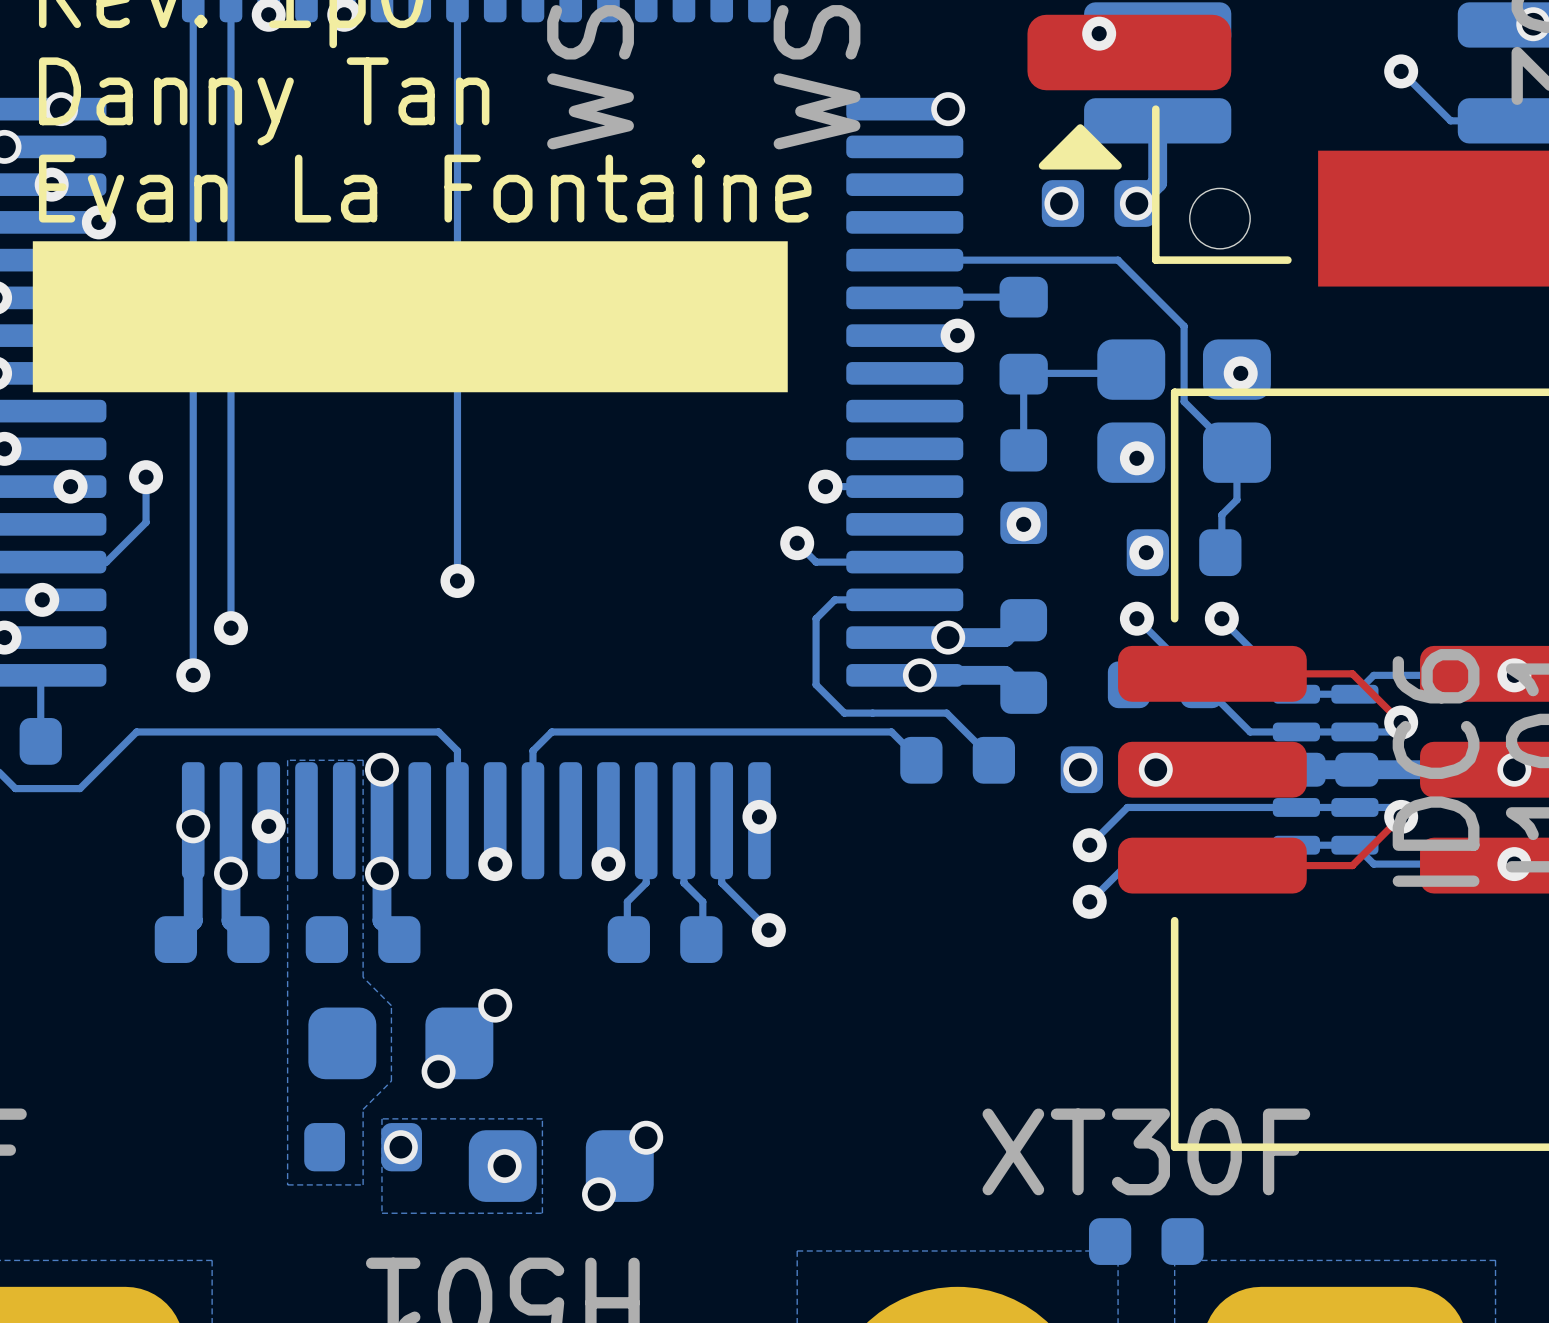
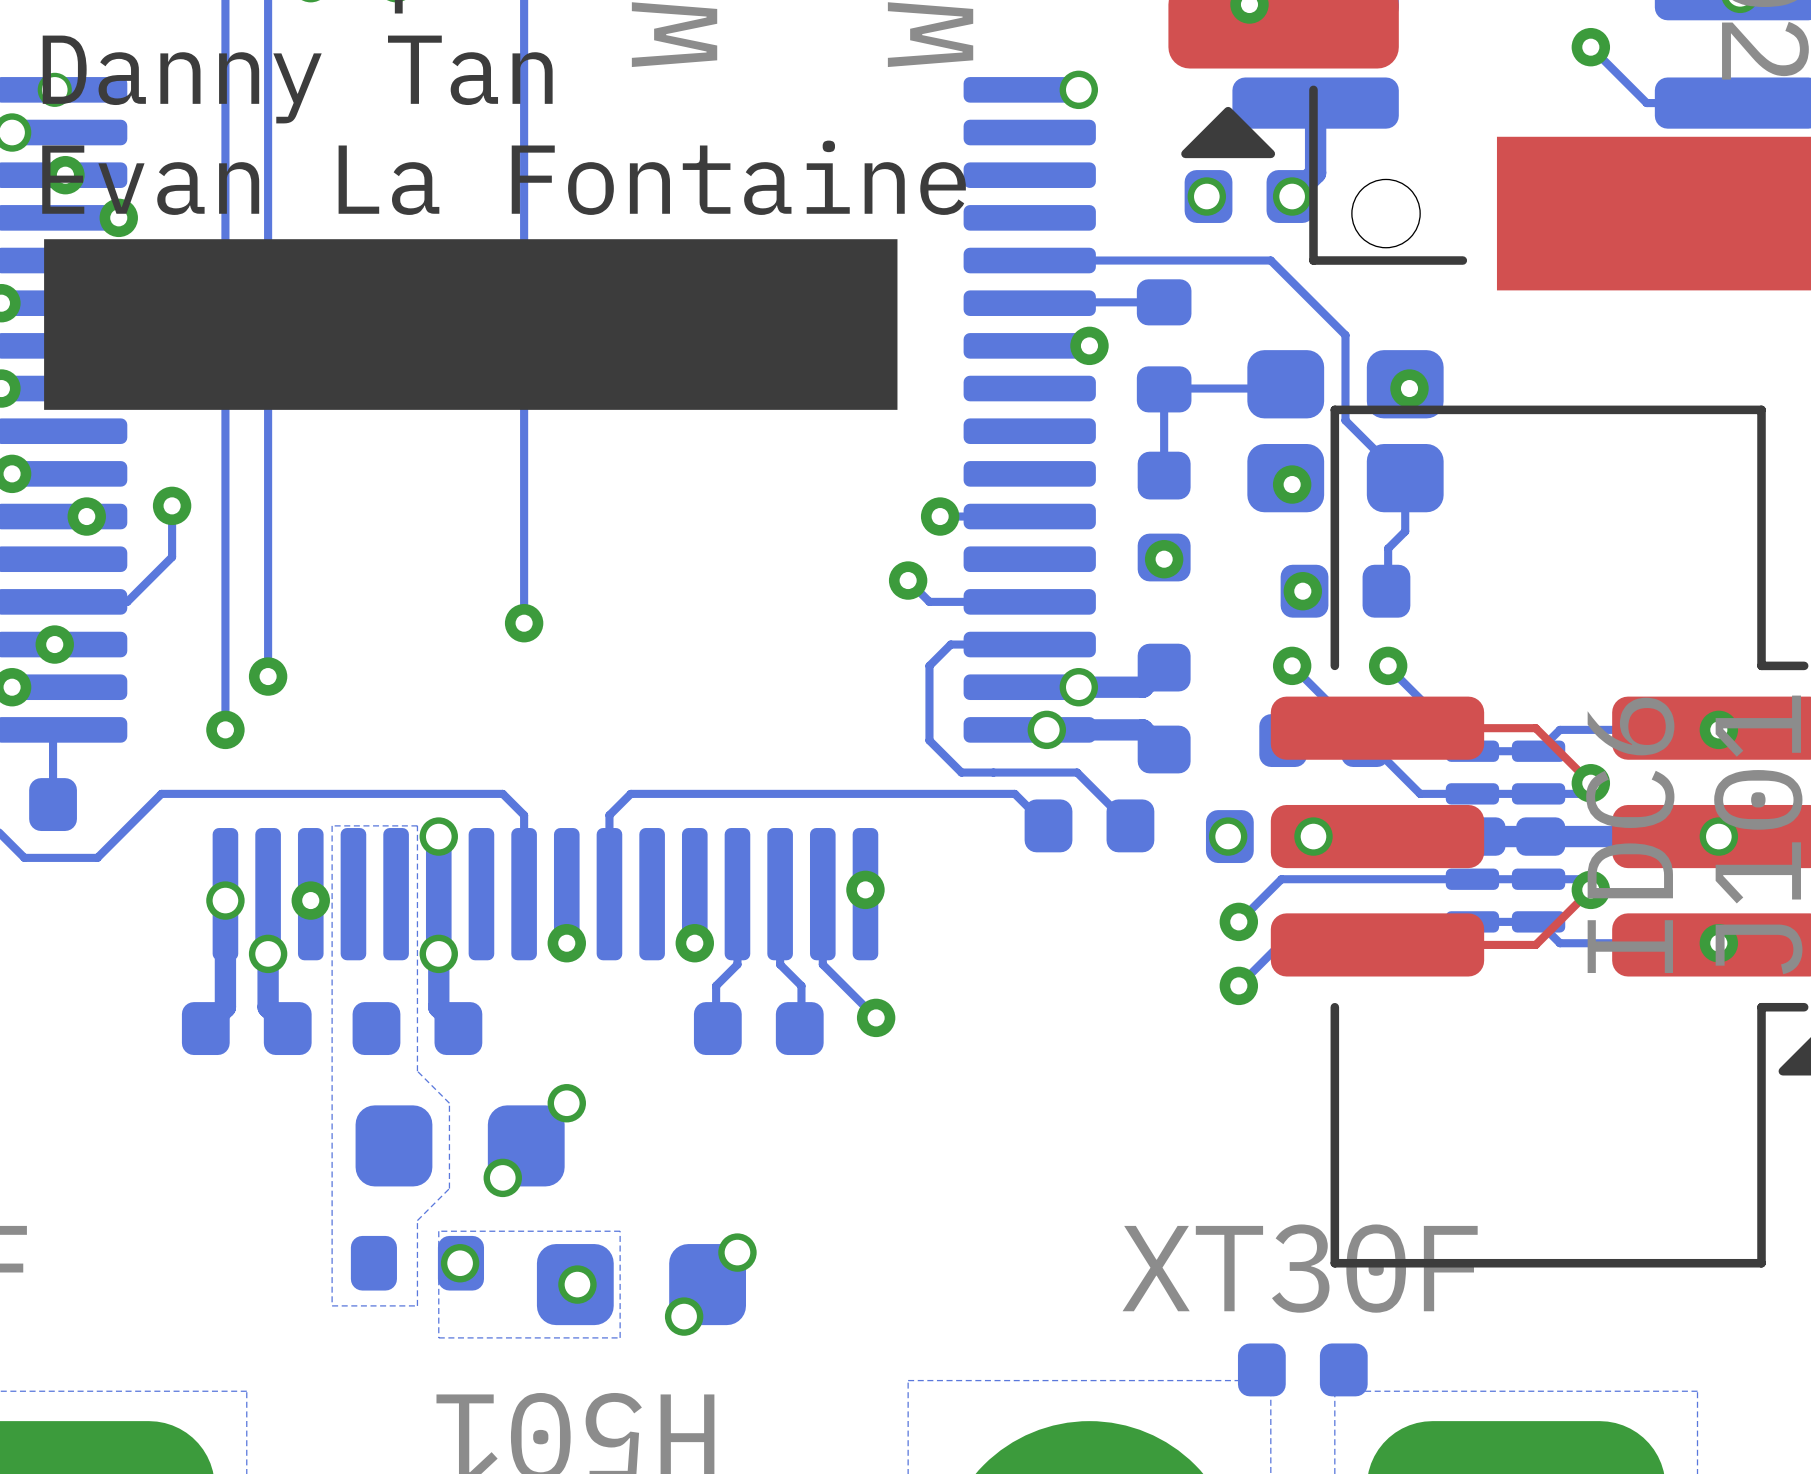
via position: (61, 109) -> (54, 89)

